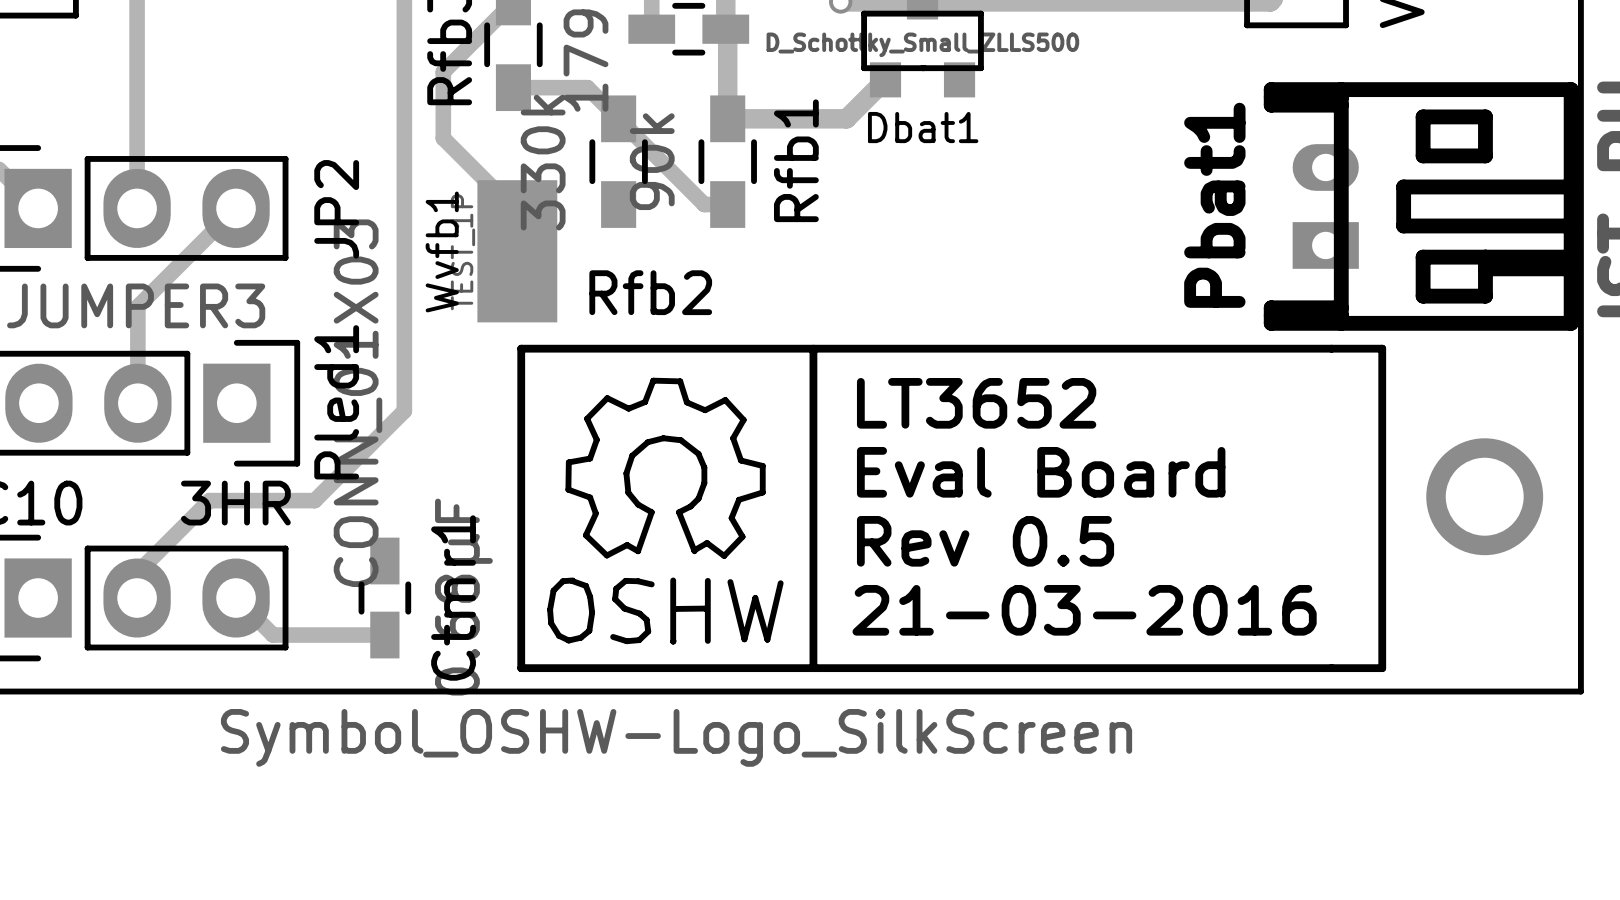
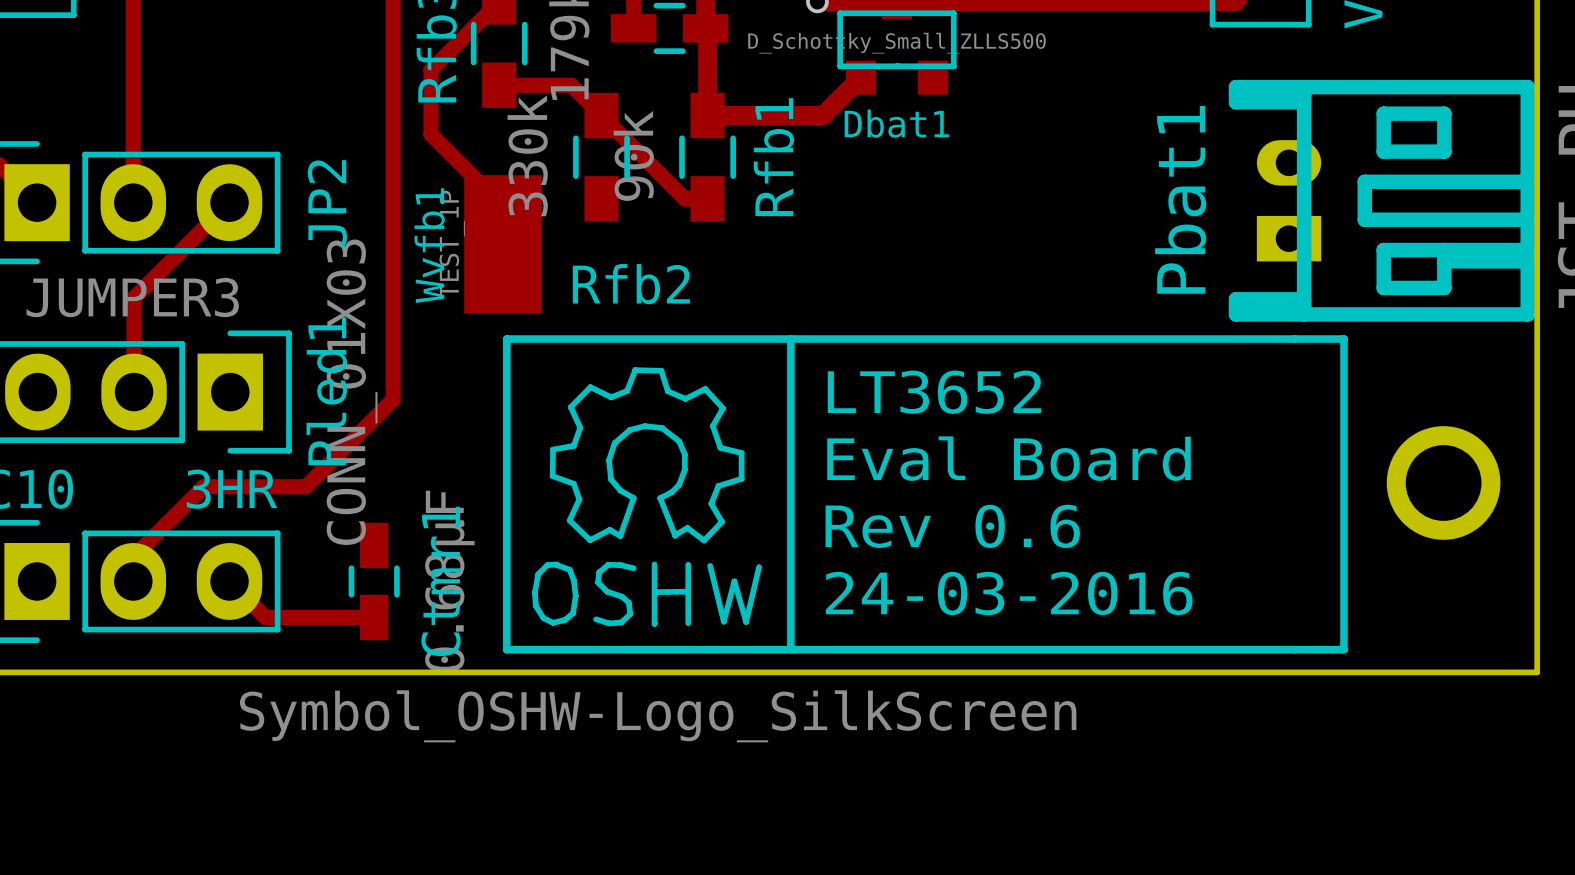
text: Rev 0.5 (985, 541) -> Rev 0.6 (952, 526)
text: 21-03-2016 (1084, 610) -> 24-03-2016 (1009, 593)

